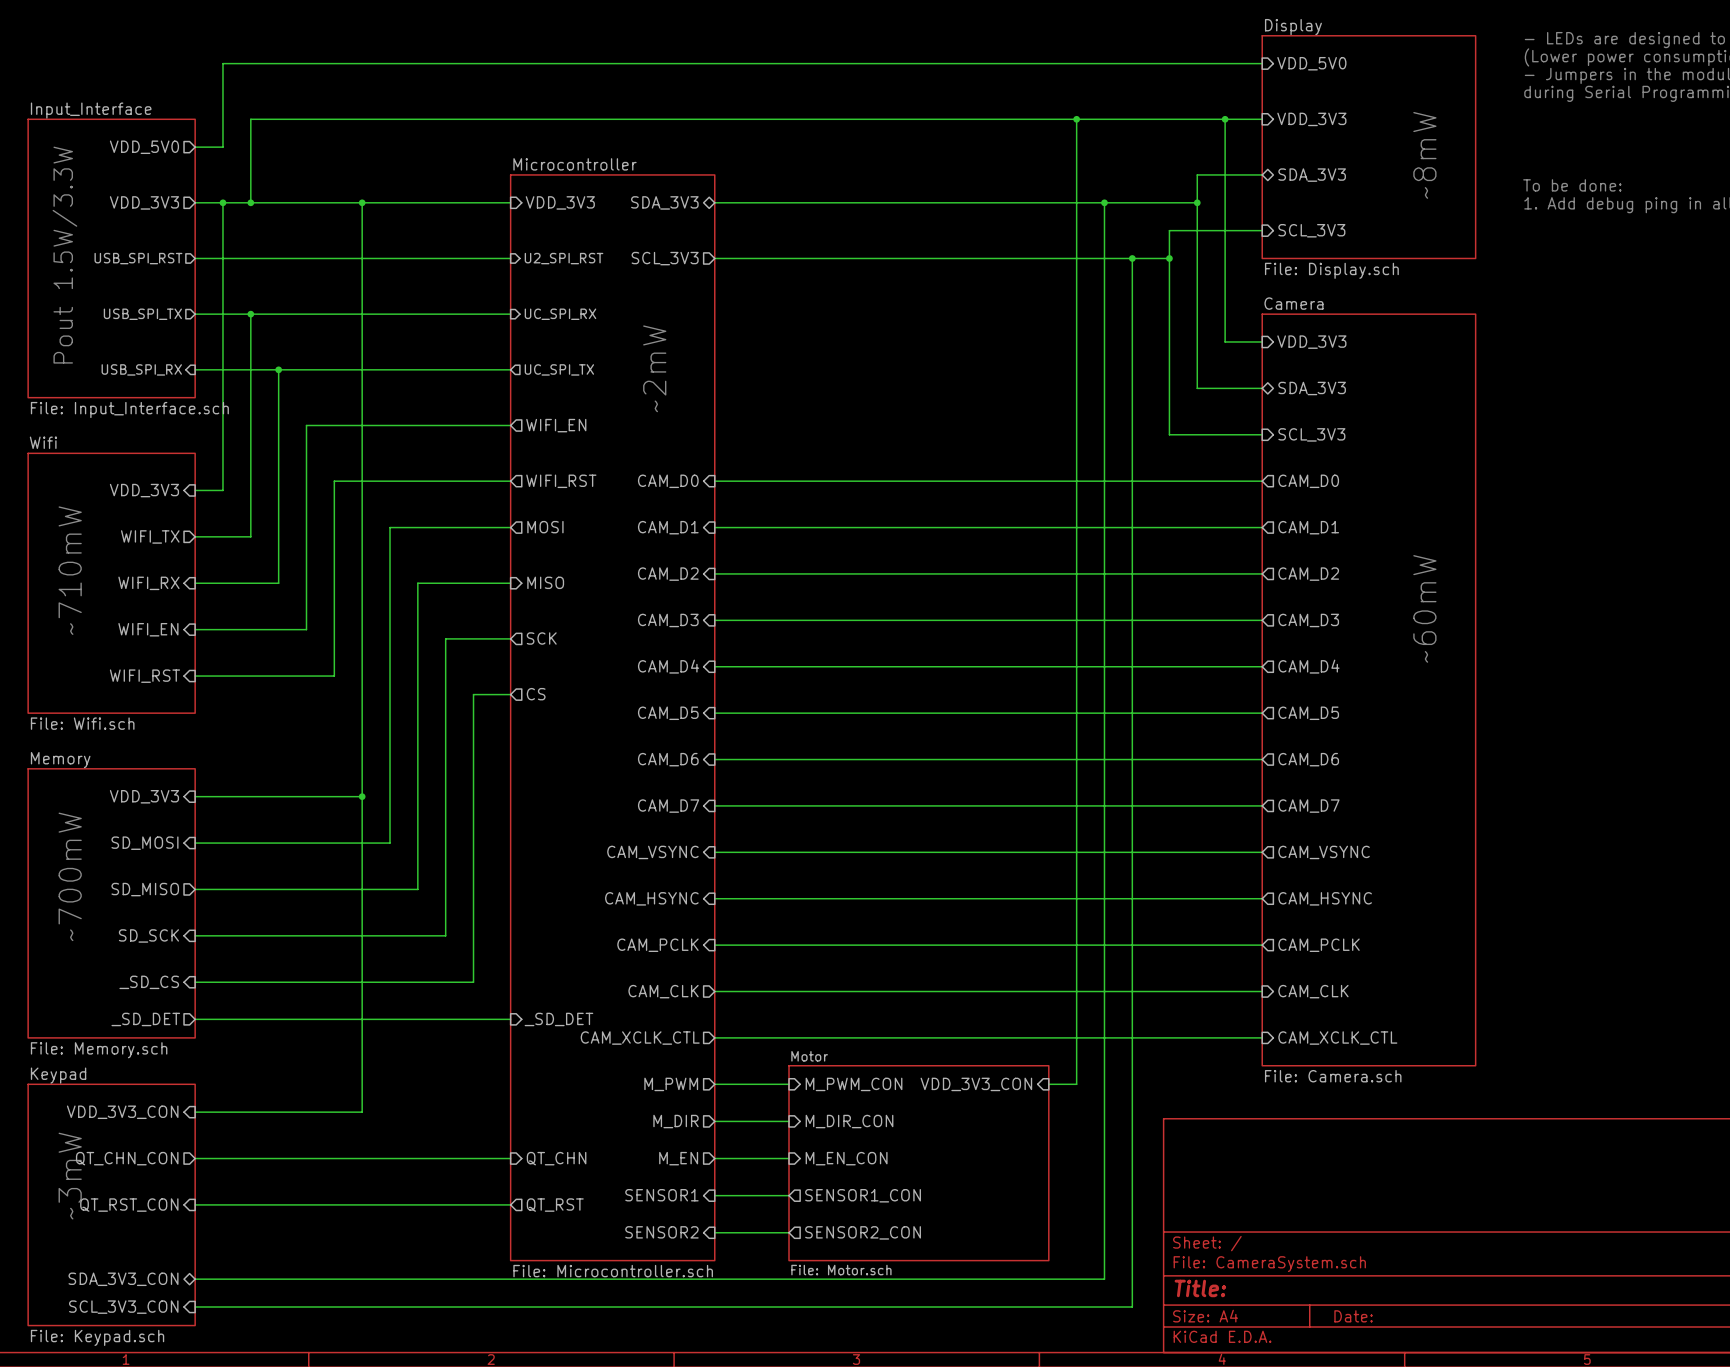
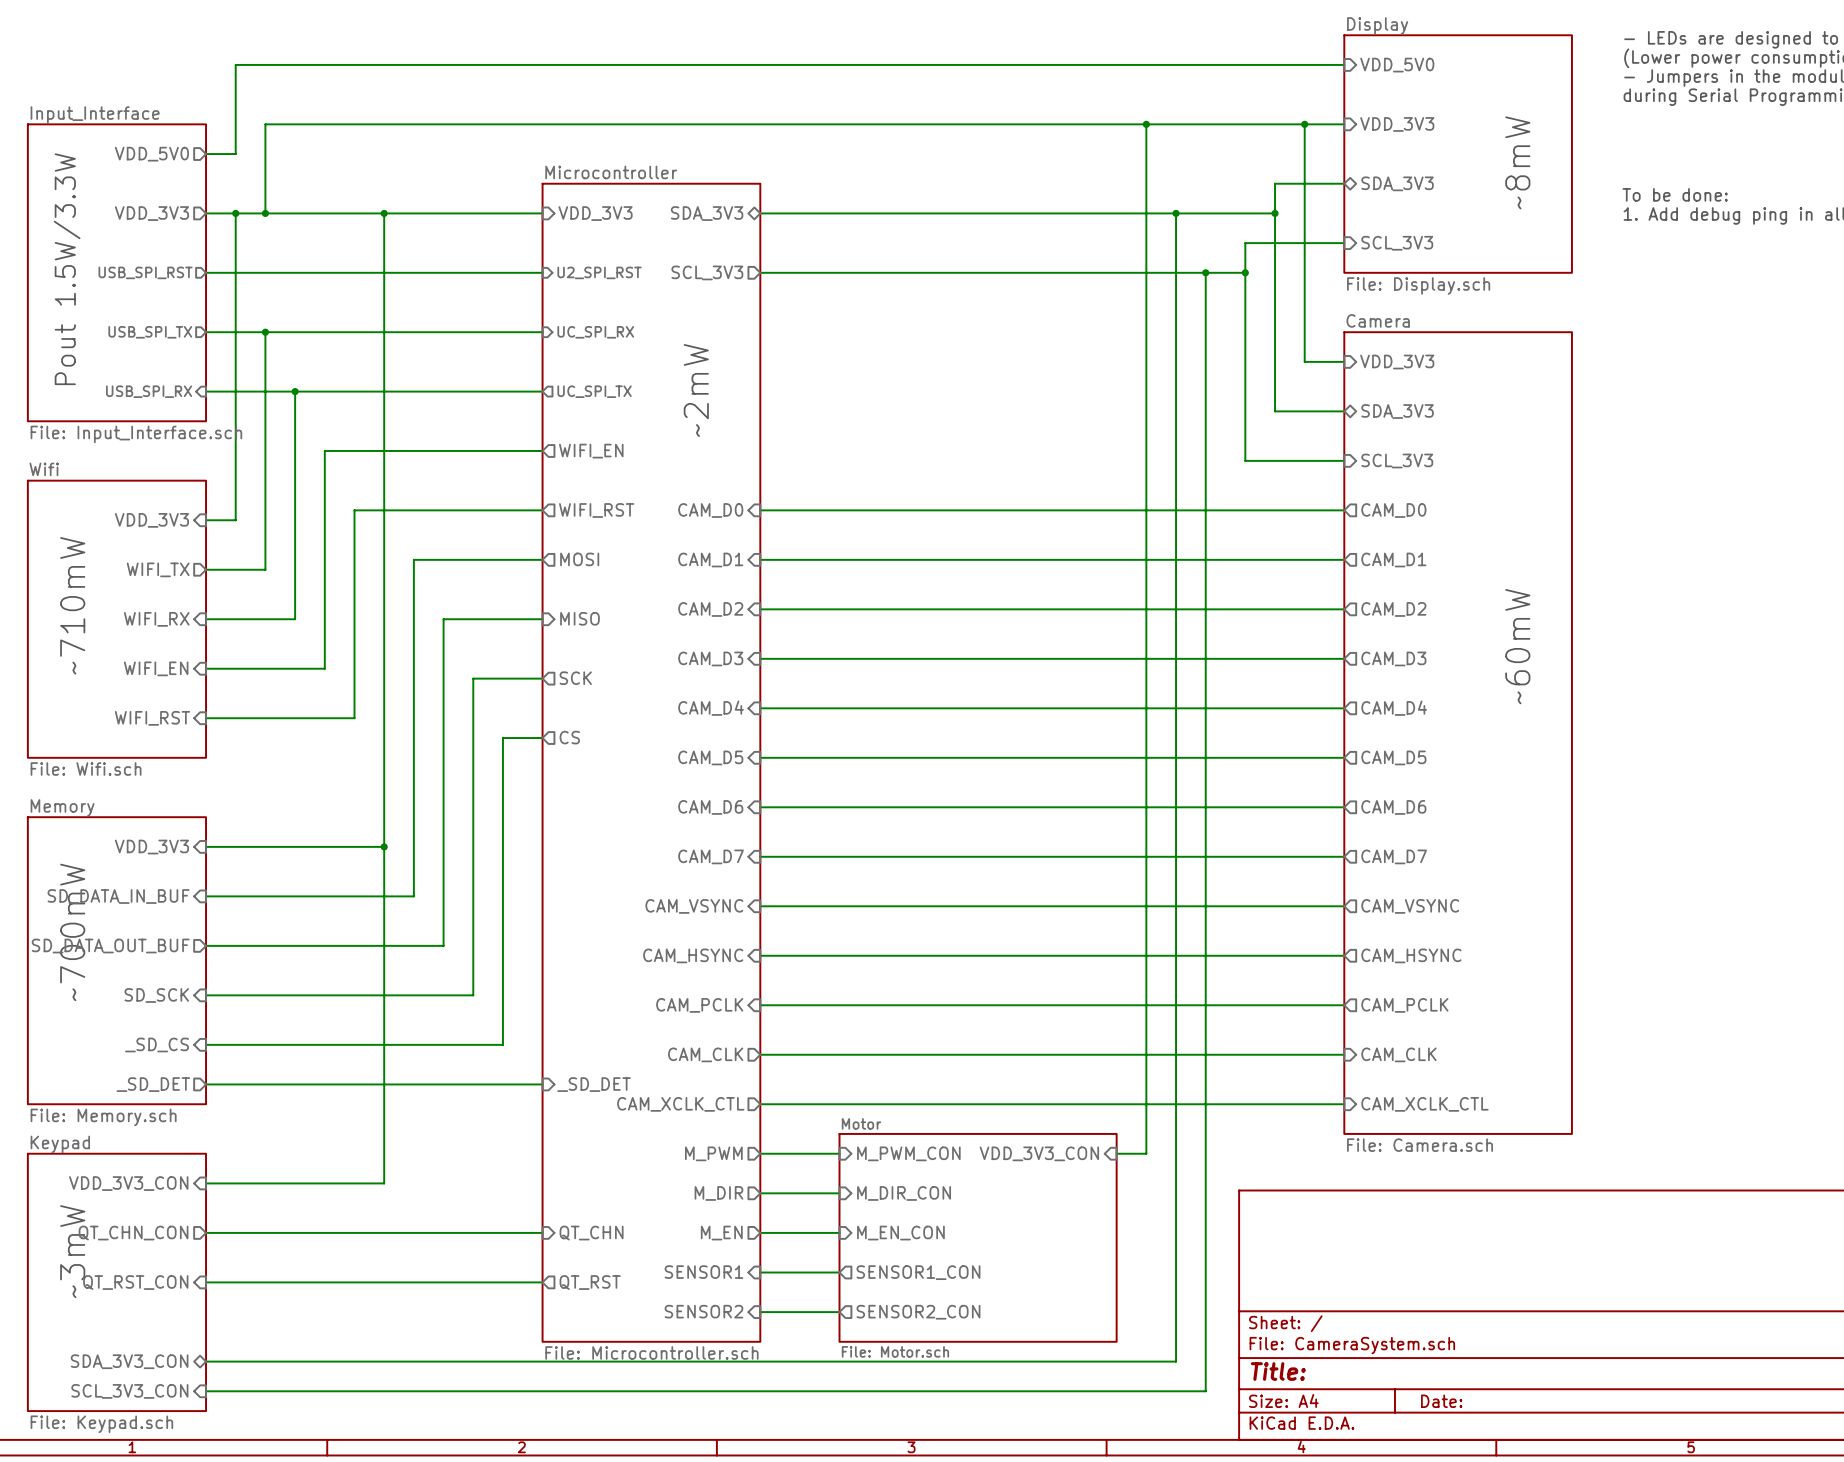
sheet pin: SD_MOSI (144, 843) -> SD_DATA_IN_BUF (118, 896)
sheet pin: SD_MISO (145, 889) -> SD_DATA_OUT_BUF (110, 946)

